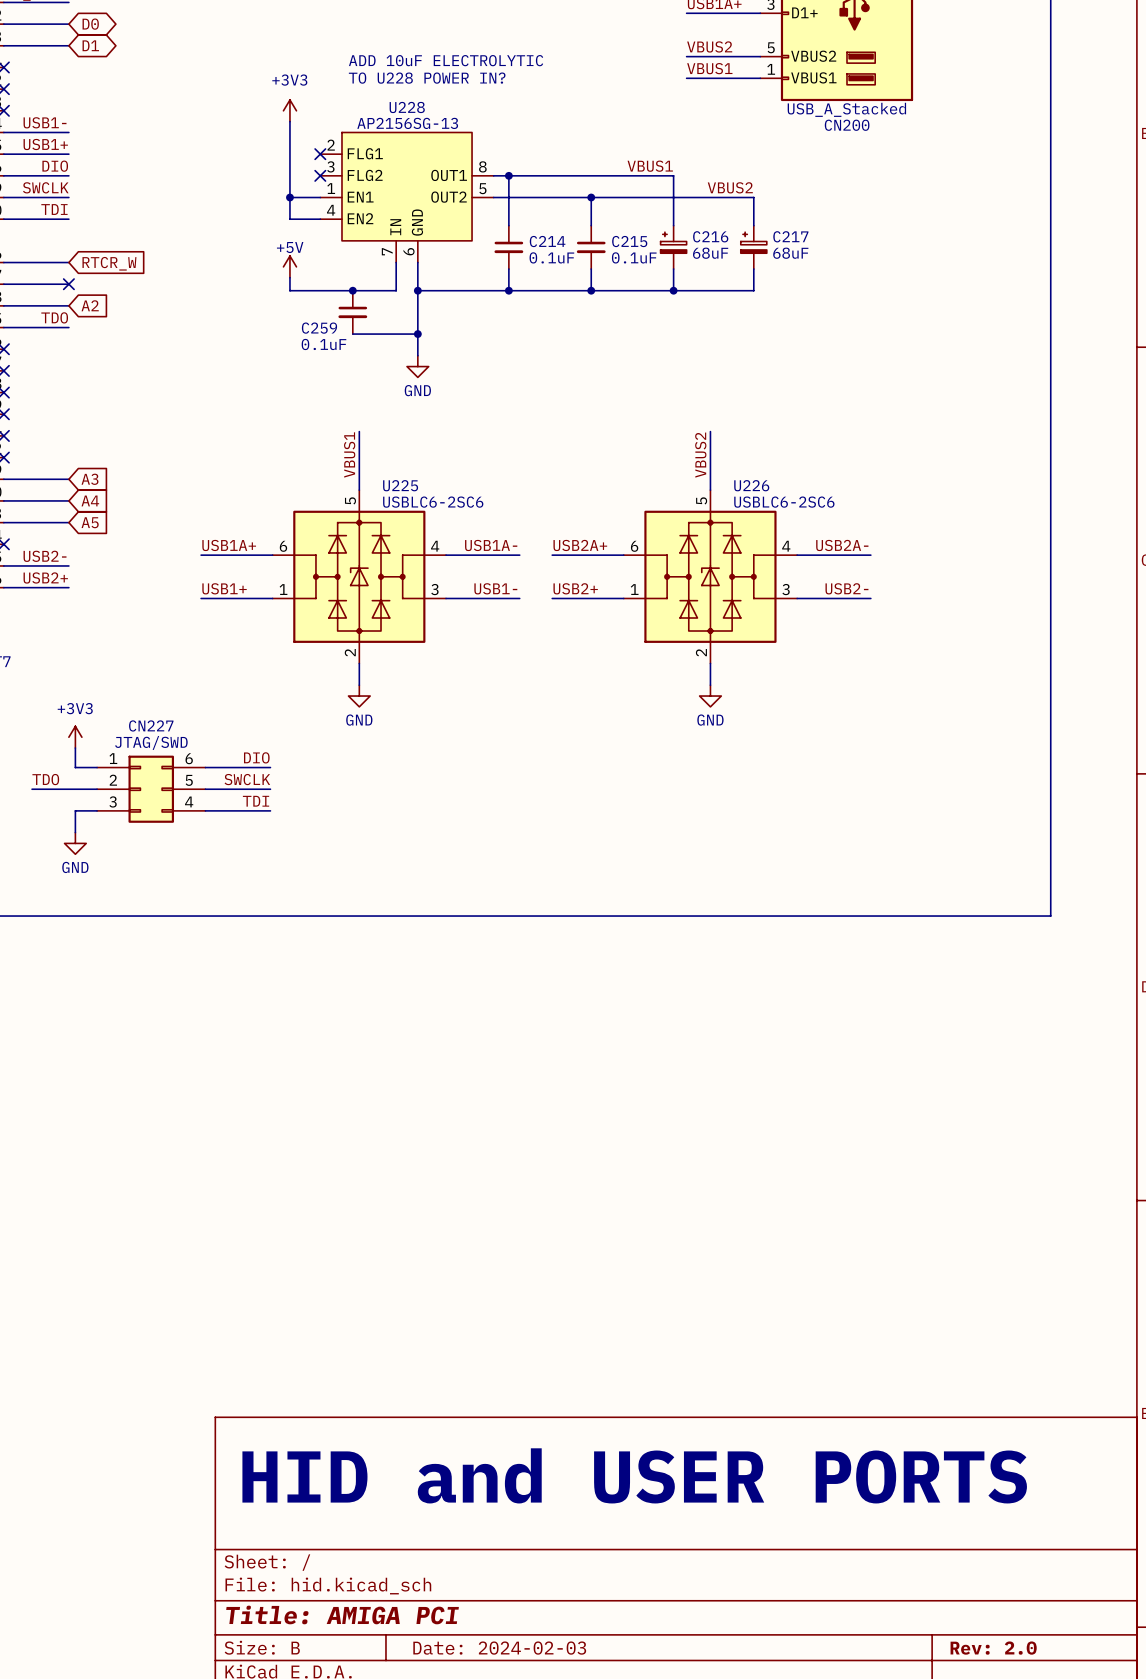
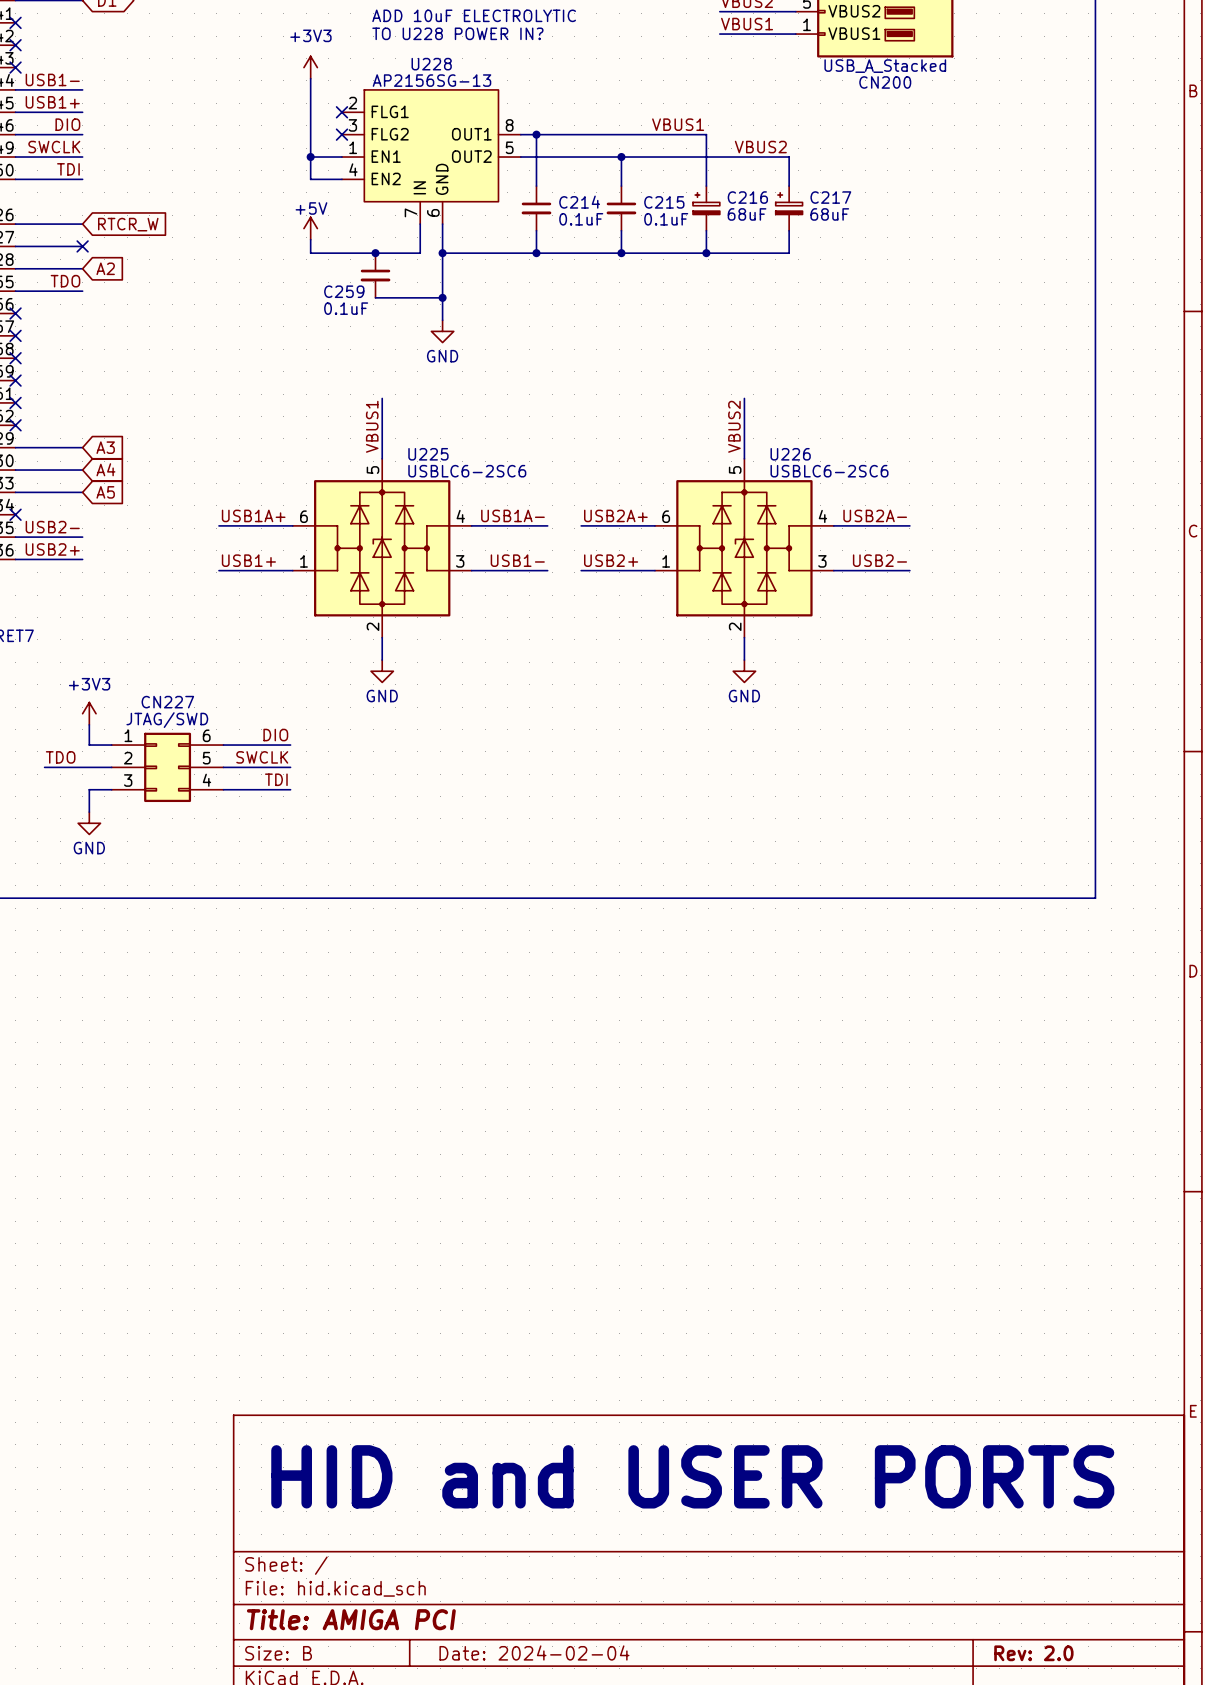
title block: Date: 2024-02-03 (499, 1648) -> Date: 2024-02-04 (534, 1652)

